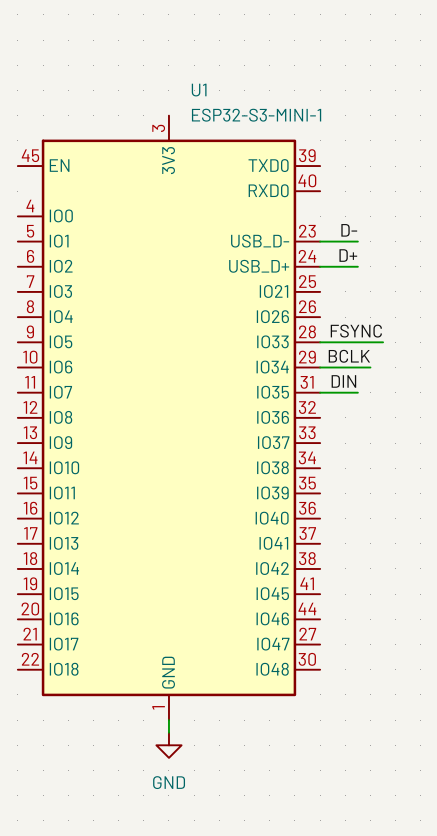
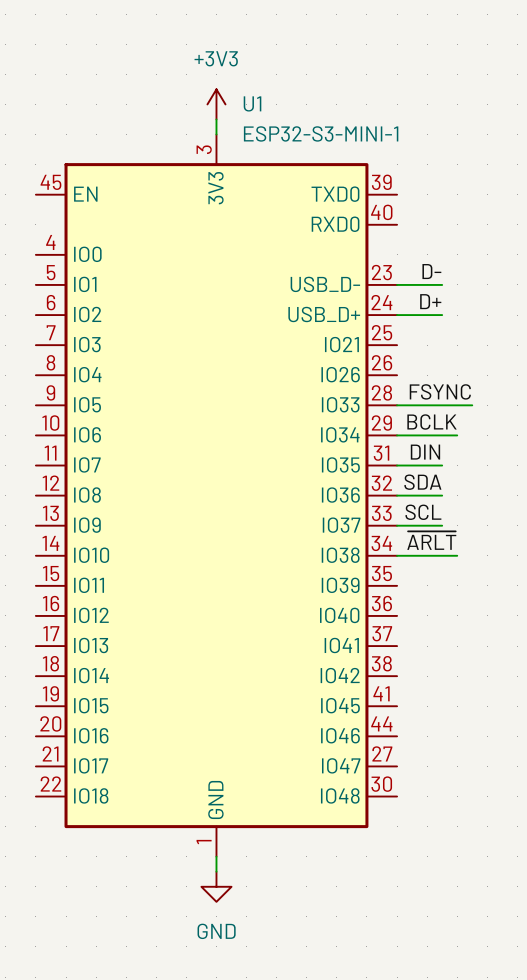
power symbol: none -> +3V3 (216, 104)
wire: none -> (216, 119) (216, 134)
label: none -> SDA (422, 482)
wire: none -> (397, 495) (442, 495)
label: none -> SCL (423, 512)
wire: none -> (397, 525) (442, 525)
label: none -> ~{ARLT} (431, 540)
wire: none -> (397, 555) (457, 555)

